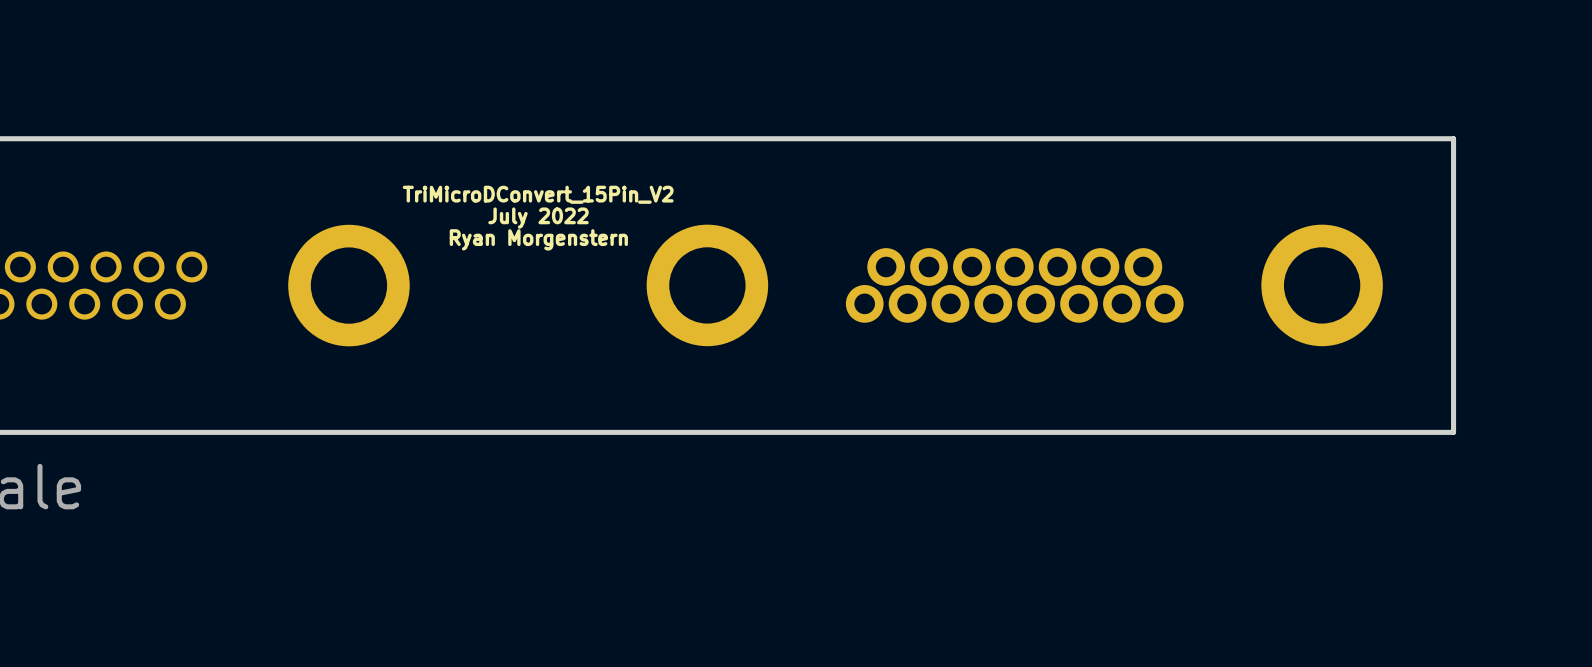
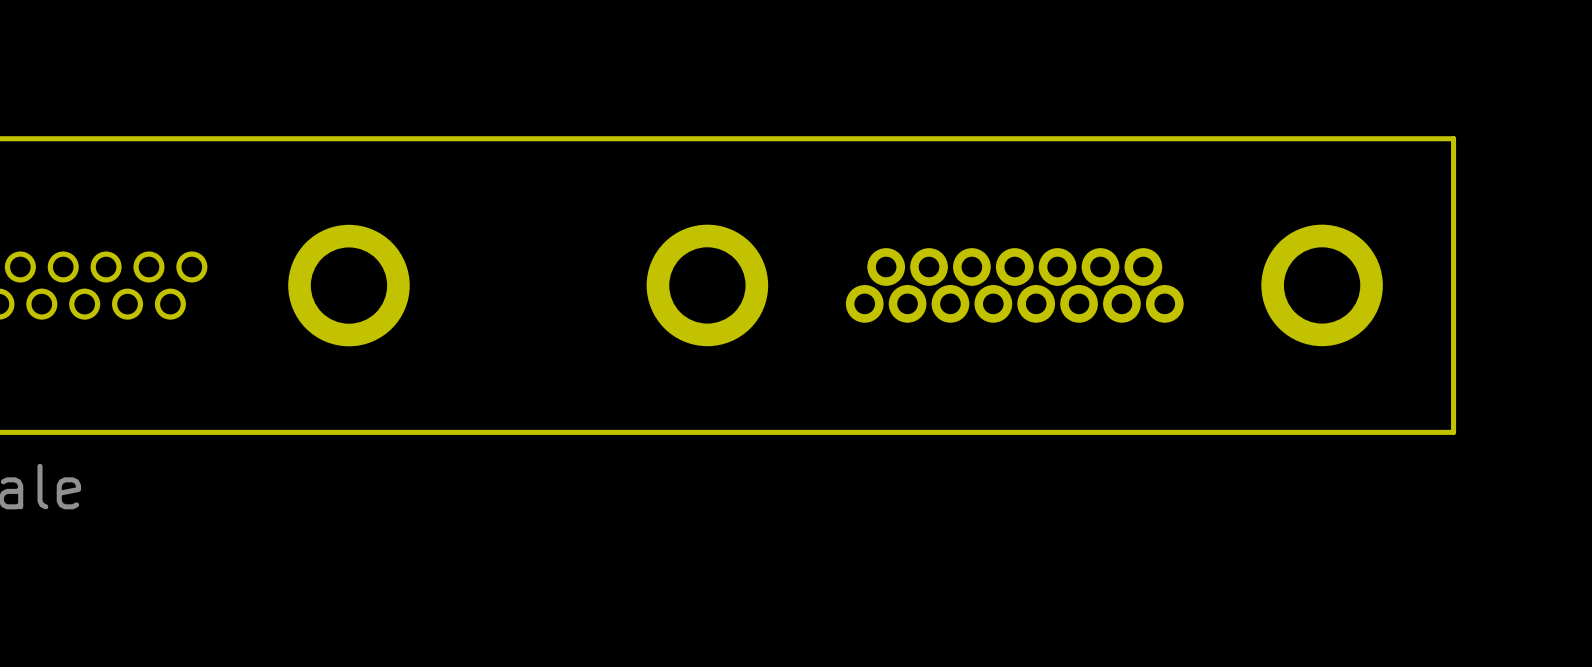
text: TriMicroDConvert_15Pin_V2 (538, 194) -> none
text: July 2022 (538, 218) -> none
text: Ryan Morgenstern (538, 239) -> none

